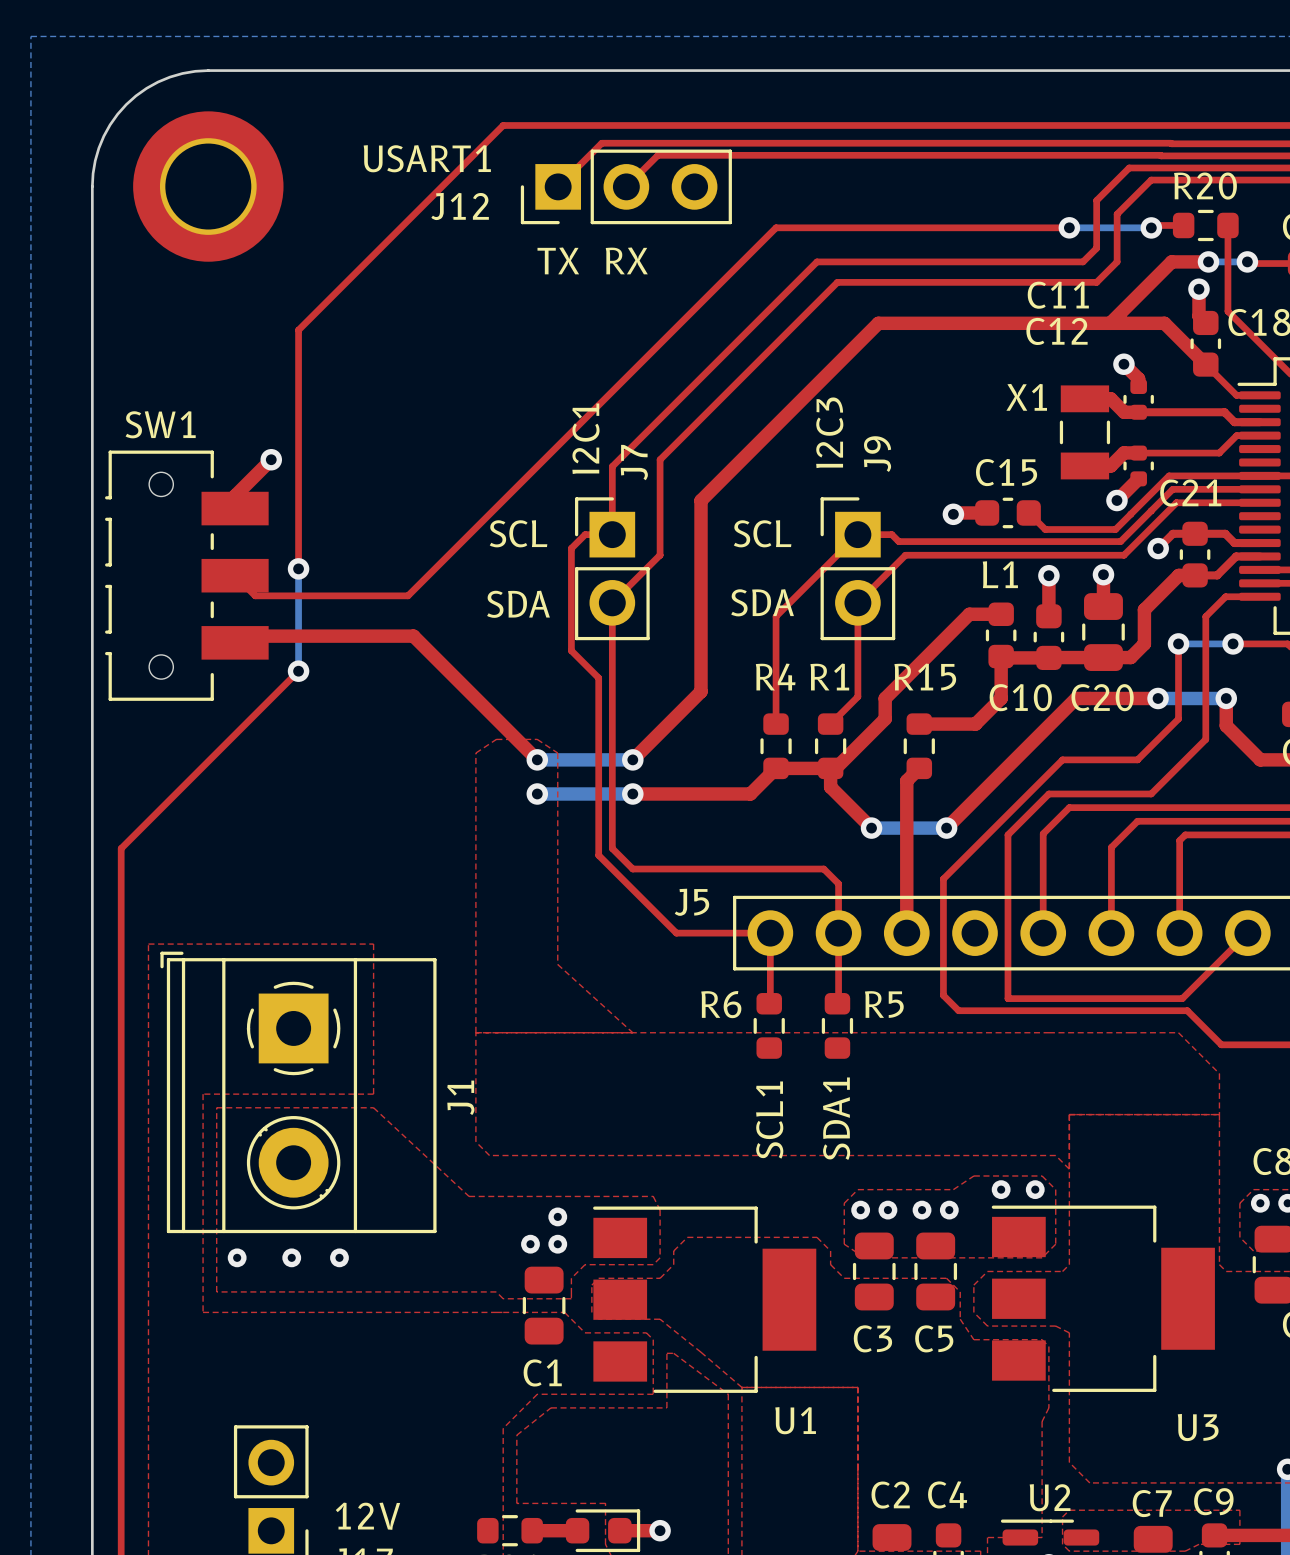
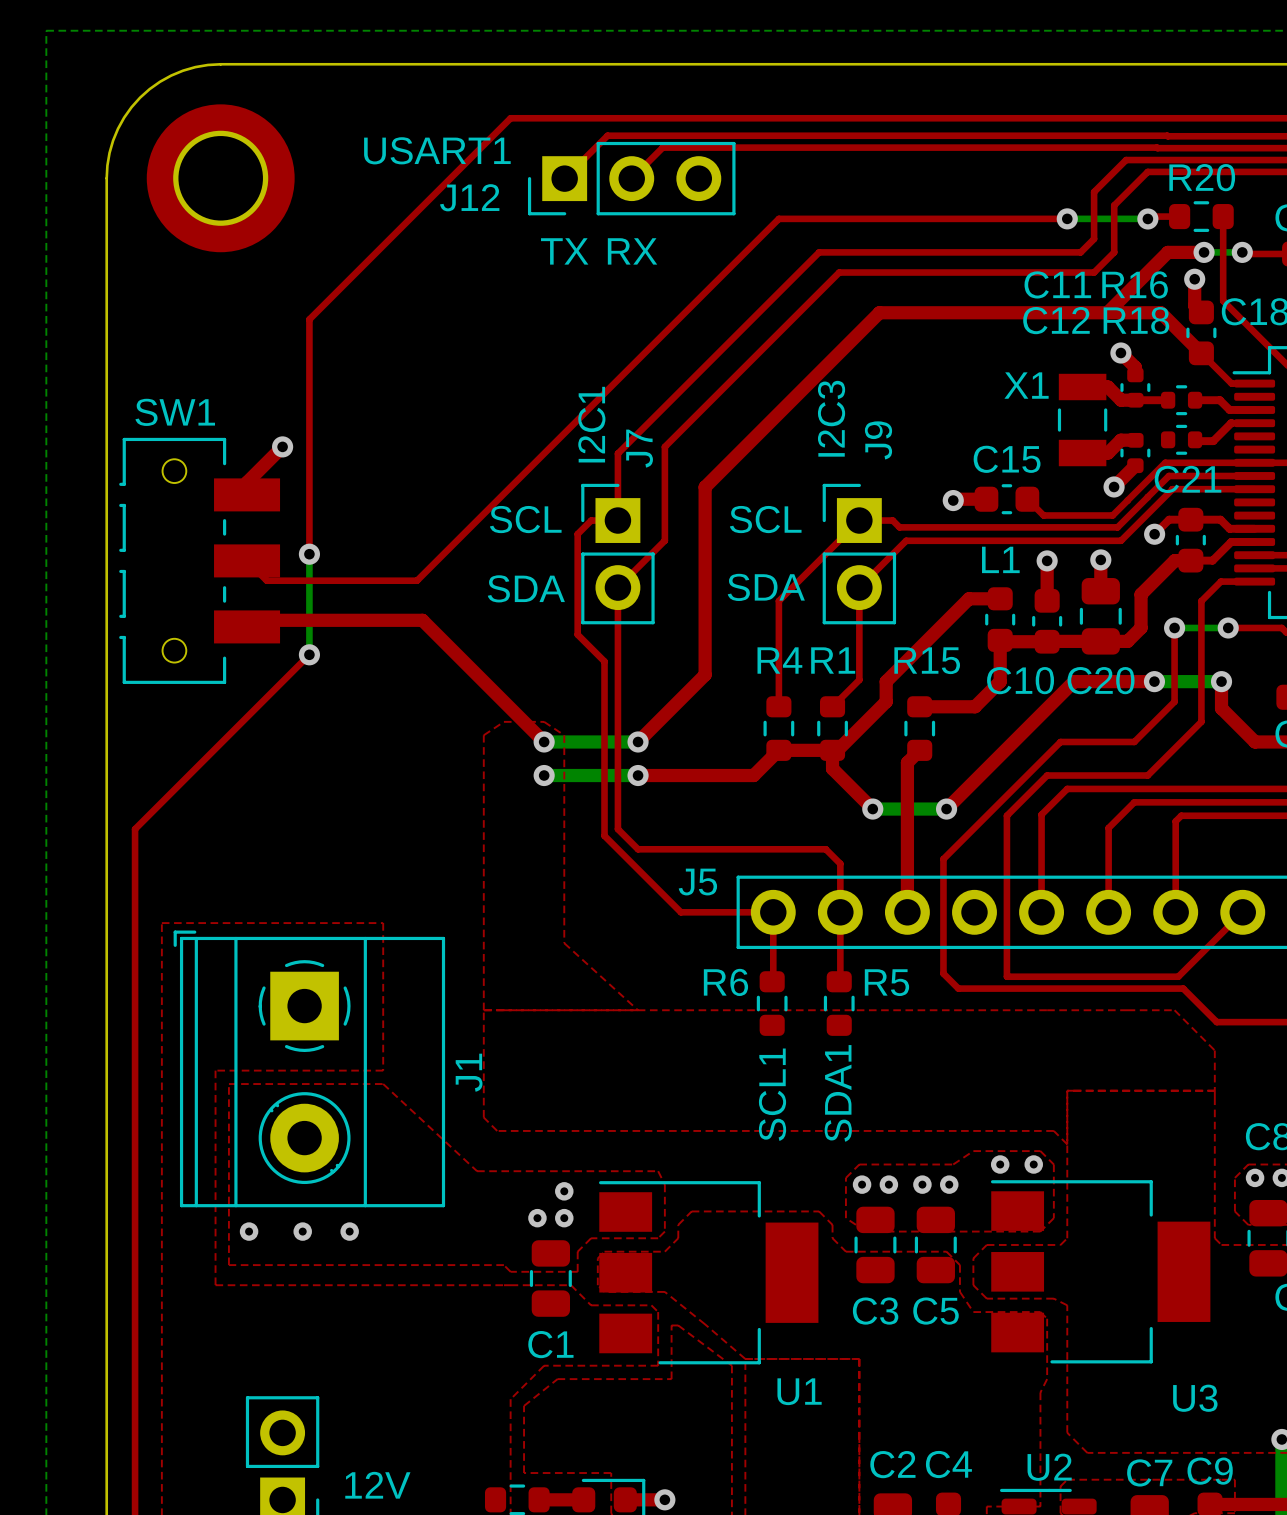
top track: (1171, 412) (1199, 412) -> none
R16: none -> (1181, 400)
top track: (1236, 435) (1219, 453) (1138, 453) -> (1231, 423) (1213, 441) (1195, 439)
R18: none -> (1181, 439)

